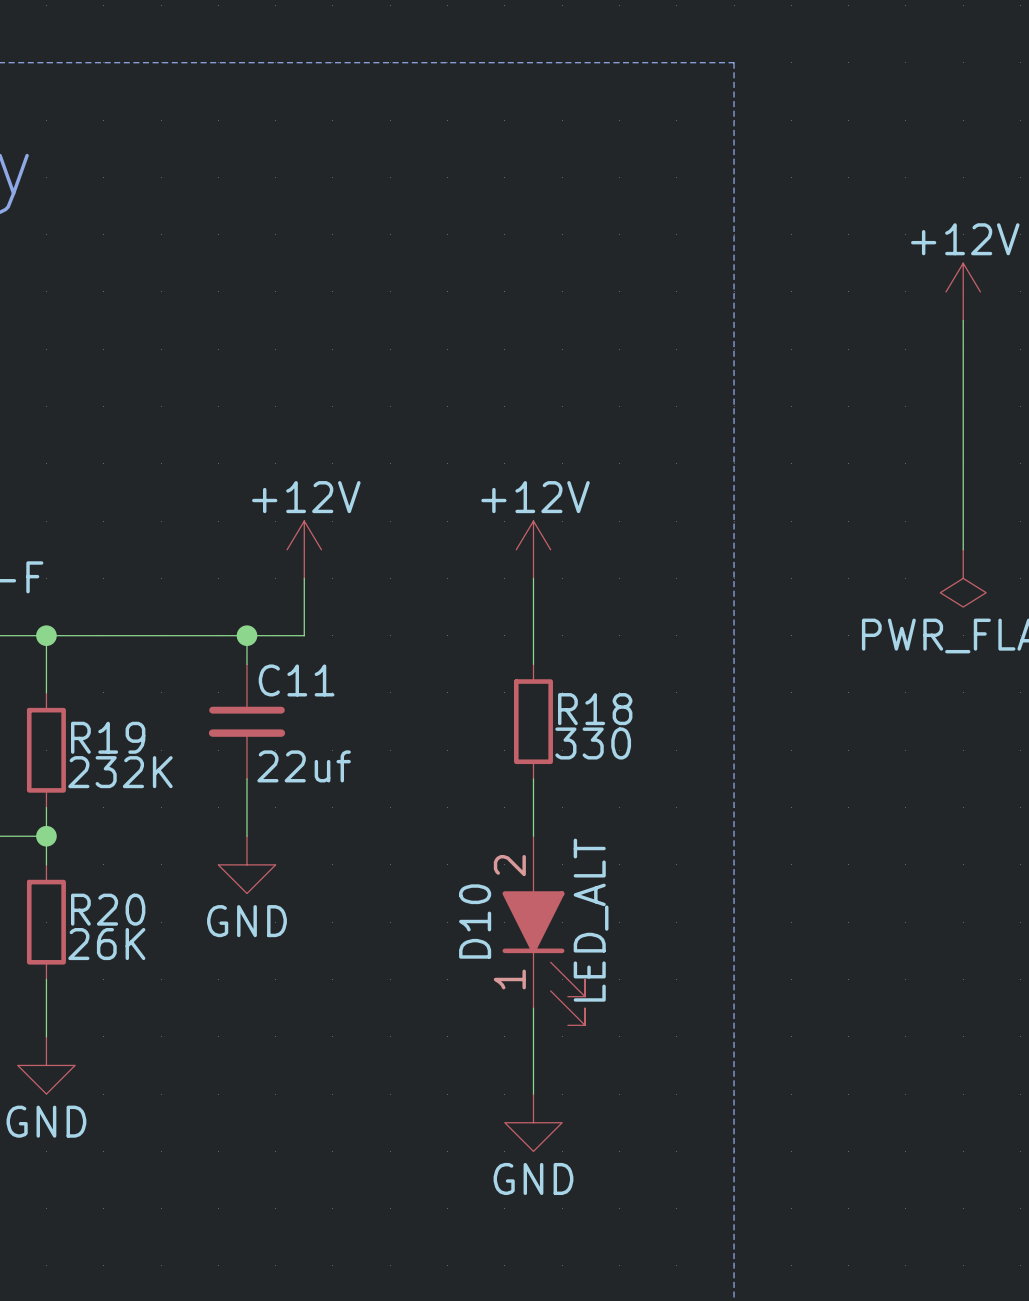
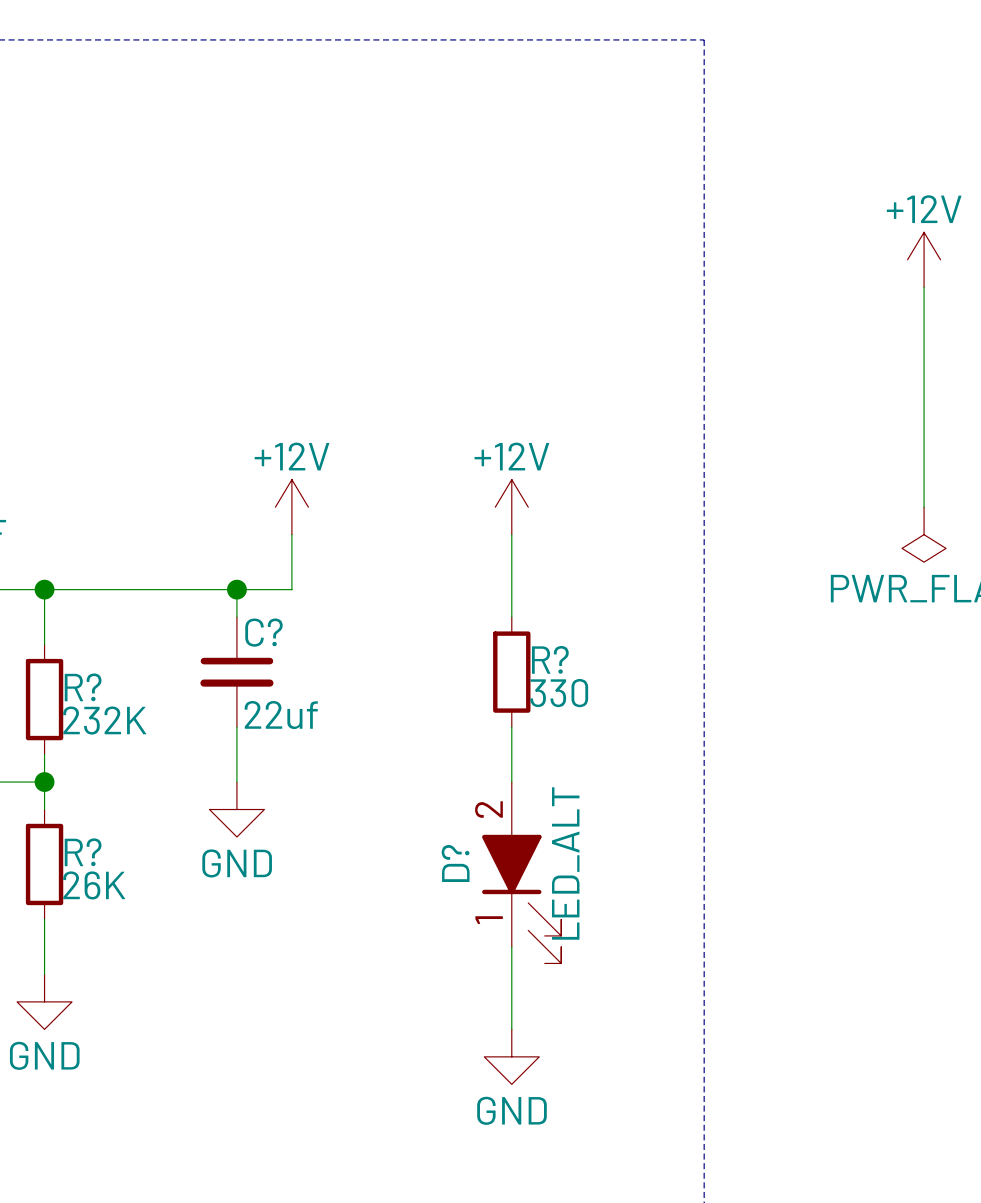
C11 name: C11 (296, 680) -> C? (263, 632)
R18 name: R18 (595, 709) -> R? (550, 659)
R19 name: R19 (108, 737) -> R? (83, 687)
R20 name: R20 (108, 909) -> R? (83, 852)
D10 name: D10 (475, 921) -> D? (455, 863)

